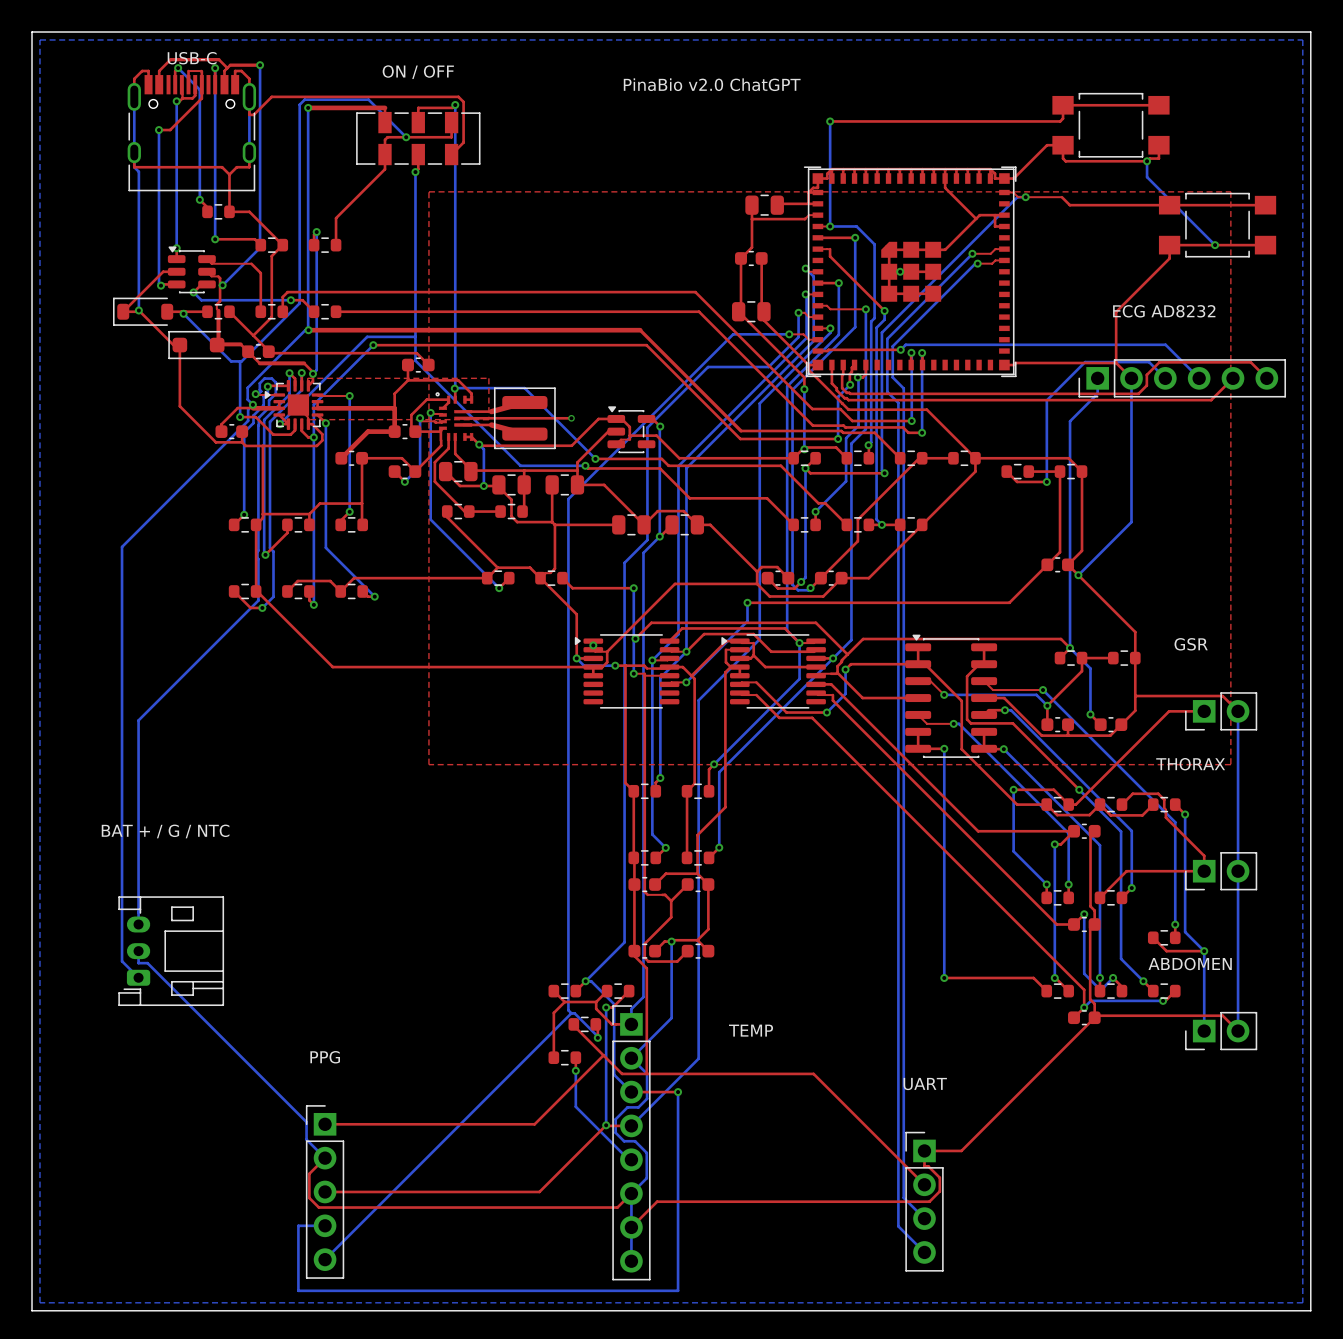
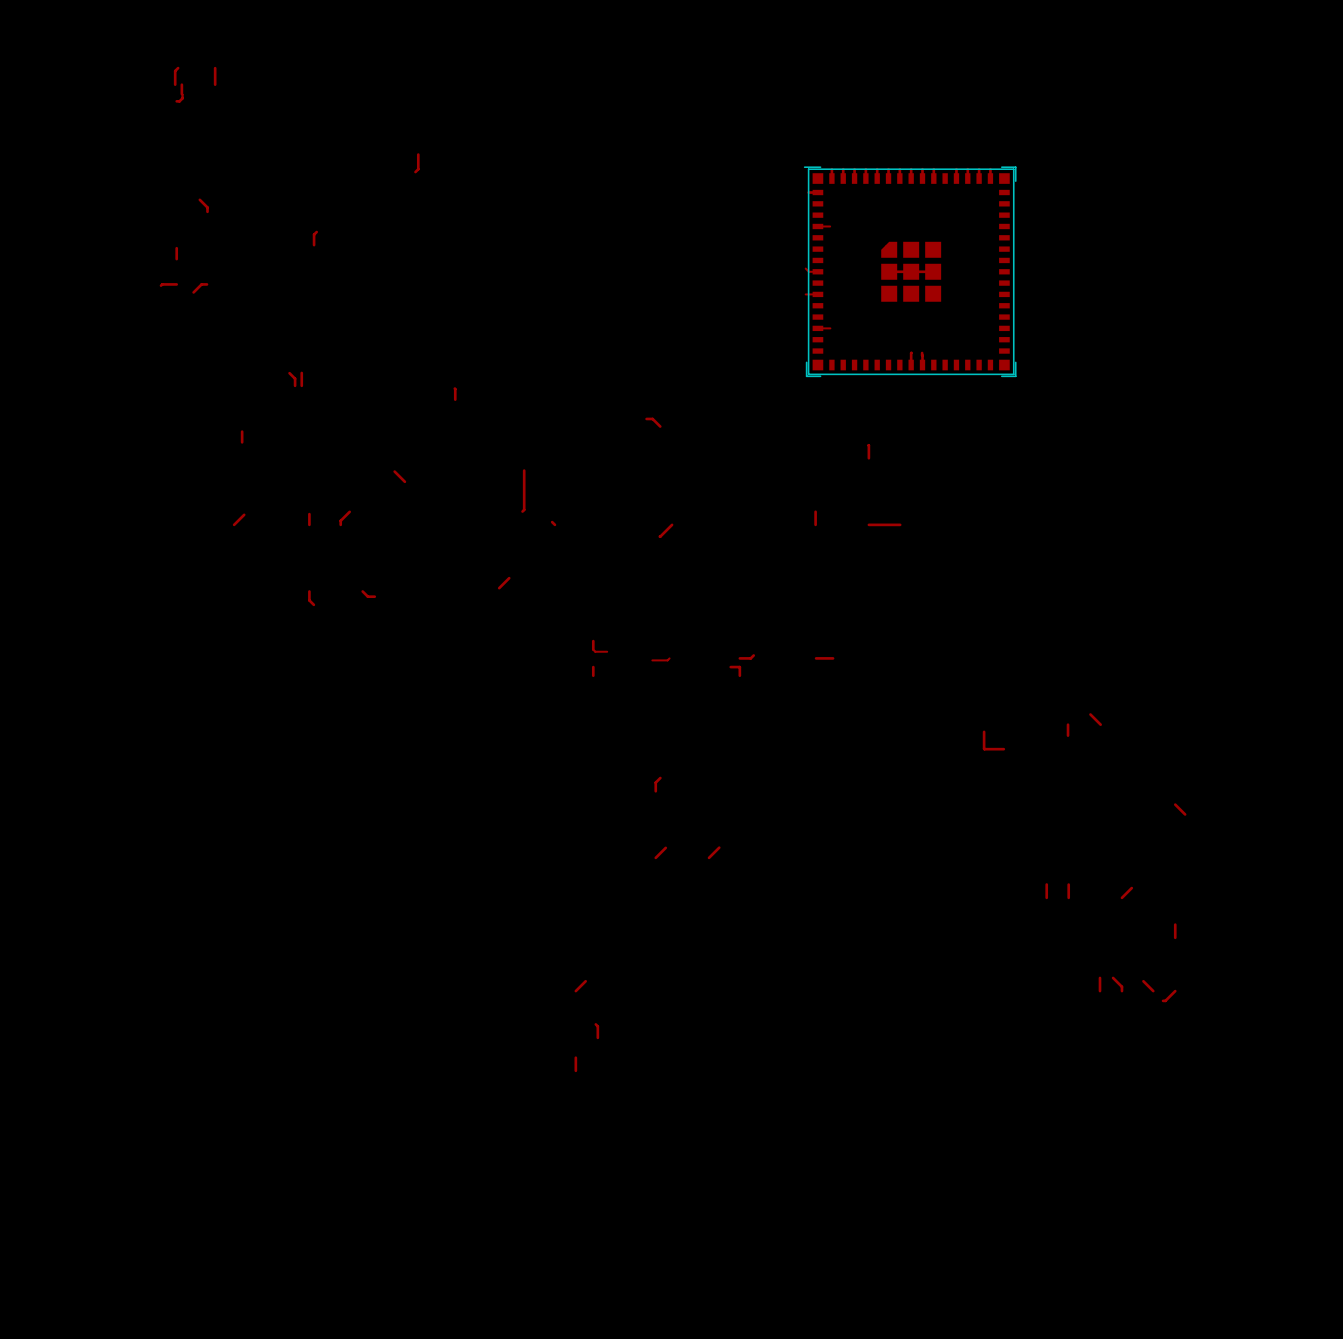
board edge: (32, 32) (1310, 32) (1310, 1310) (32, 1310) (32, 32) -> none
bottom zone outline: (39, 39) (1302, 39) (1302, 1302) (39, 1302) (39, 39) -> none
text: USB-C (192, 58) -> none
top track: (260, 65) (230, 65) (224, 71) (224, 84) -> none
bottom track: (260, 65) (260, 247) (222, 285) -> none
via: (260, 65) -> none
bottom track: (178, 68) (199, 89) (199, 199) -> none
via: (178, 68) -> none
bottom track: (215, 68) (215, 239) -> none
via: (215, 68) -> none
top track: (227, 68) (218, 59) (170, 59) (159, 71) (159, 84) -> none
text: ON / OFF (418, 72) -> none
top track: (148, 84) (148, 71) (142, 71) (134, 78) (134, 96) -> none
top track: (188, 84) (188, 71) (201, 71) (201, 98) (170, 130) (158, 130) -> none
top track: (195, 84) (195, 95) (192, 98) (182, 98) -> none
top track: (235, 84) (235, 71) (241, 71) (249, 78) (249, 114) (253, 114) (271, 96) (458, 96) (463, 101) (463, 142) (451, 154) -> none
text: PinaBio v2.0 ChatGPT (712, 84) -> none
bottom track: (134, 96) (134, 167) (138, 171) (138, 310) -> none
bottom track: (249, 96) (249, 152) -> none
bottom track: (176, 101) (176, 248) -> none
via: (176, 101) -> none
top track: (455, 104) (452, 107) (418, 107) (418, 122) -> none
bottom track: (455, 104) (455, 388) -> none
via: (455, 104) -> none
top track: (1158, 105) (1063, 105) (1063, 118) (1060, 121) (830, 121) -> none
top track: (308, 107) (385, 107) (385, 122) -> none
bottom track: (308, 107) (308, 330) (305, 330) (247, 387) (247, 399) (252, 404) (248, 409) (248, 420) (122, 546) (122, 961) (138, 977) -> none
via: (308, 107) -> none
bottom track: (830, 121) (830, 226) (856, 226) (874, 244) (874, 318) (871, 321) (871, 442) (868, 445) -> none
via: (830, 121) -> none
top track: (451, 122) (451, 137) (387, 137) (385, 139) (385, 169) (336, 218) (336, 245) -> none
part: (1110, 125) -> none
bottom track: (158, 130) (158, 283) (161, 285) -> none
via: (158, 130) -> none
part: (191, 133) -> none
bottom track: (406, 137) (368, 99) (304, 99) (299, 104) (299, 303) (241, 361) (231, 361) (183, 313) -> none
via: (406, 137) -> none
part: (418, 138) -> none
top track: (1158, 145) (1158, 158) (1149, 158) (1147, 161) (1065, 161) (1063, 158) (1063, 145) (1047, 145) (1013, 178) (995, 178) (995, 173) (990, 169) (831, 169) (827, 173) (827, 178) (817, 178) (817, 187) (813, 187) (808, 192) (808, 203) -> none
top track: (134, 152) (134, 167) (222, 167) (229, 174) -> none
top track: (249, 152) (249, 167) (236, 167) (229, 174) -> none
bottom track: (1147, 161) (1147, 177) (1215, 245) -> none
via: (1147, 161) -> none
top track: (945, 169) (945, 187) (976, 218) -> none
bottom track: (415, 172) (415, 360) (520, 465) (585, 465) -> none
via: (415, 172) -> none
top track: (229, 174) (229, 211) (249, 211) (282, 245) (271, 256) (271, 317) (253, 335) -> none
top zone outline: (428, 191) (1230, 191) (1230, 764) (428, 764) (428, 191) -> none
top track: (1004, 192) (1013, 192) (1018, 197) (1061, 197) (1069, 205) (1265, 205) -> none
bottom track: (1025, 197) (1017, 197) (881, 332) (881, 470) (884, 473) -> none
via: (1025, 197) -> none
via: (199, 199) -> none
top track: (817, 203) (777, 205) -> none
top track: (751, 205) (751, 247) (741, 258) (741, 309) (738, 311) (804, 377) (804, 389) -> none
part: (764, 205) -> none
part: (218, 211) -> none
top track: (817, 215) (808, 215) (804, 219) (751, 219) -> none
top track: (995, 215) (995, 226) (1004, 226) -> none
top track: (1004, 215) (979, 215) (945, 249) (889, 249) (889, 293) (933, 293) -> none
part: (1217, 225) -> none
via: (830, 226) -> none
bottom track: (316, 232) (316, 370) (312, 373) -> none
via: (316, 232) -> none
top track: (817, 237) (855, 237) -> none
bottom track: (855, 237) (855, 327) (792, 389) (792, 584) (798, 590) (808, 590) (810, 588) -> none
via: (855, 237) -> none
top track: (215, 239) (254, 239) (260, 245) -> none
via: (215, 239) -> none
part: (271, 245) -> none
part: (325, 245) -> none
via: (1215, 245) -> none
top track: (1265, 245) (1169, 245) (1169, 258) (1116, 311) (1116, 363) -> none
via: (176, 248) -> none
top track: (817, 249) (830, 249) (830, 256) (884, 310) -> none
top track: (1004, 249) (995, 249) (990, 253) (972, 253) -> none
bottom track: (972, 253) (887, 338) (887, 391) (898, 402) (898, 1226) (924, 1252) -> none
via: (972, 253) -> none
part: (751, 258) -> none
top track: (761, 258) (761, 309) (763, 311) (763, 320) (808, 365) (817, 365) -> none
top track: (207, 259) (211, 263) (251, 263) (260, 273) (260, 311) -> none
top track: (1004, 260) (995, 260) (992, 263) (977, 263) -> none
bottom track: (977, 263) (975, 263) (892, 346) (892, 377) (903, 388) (903, 1197) (924, 1218) -> none
via: (977, 263) -> none
bottom track: (805, 268) (813, 276) (813, 340) (686, 468) (686, 651) (660, 677) (660, 778) -> none
via: (805, 268) -> none
part: (191, 269) -> none
top track: (176, 271) (163, 271) (123, 311) (138, 310) (173, 345) (179, 345) (179, 406) (215, 442) (242, 442) (245, 445) (316, 445) (322, 440) (322, 434) (312, 424) (308, 424) (308, 417) (297, 407) (298, 404) -> none
top track: (207, 271) (211, 276) (220, 278) (220, 301) (216, 304) (218, 344) -> none
via: (900, 271) -> none
top track: (817, 283) (838, 283) -> none
bottom track: (838, 283) (838, 334) (787, 386) (787, 630) (799, 643) (799, 678) (714, 764) -> none
via: (838, 283) -> none
via: (161, 285) -> none
via: (222, 285) -> none
bottom track: (193, 292) (201, 300) (290, 300) -> none
via: (193, 292) -> none
bottom track: (805, 294) (806, 338) (678, 466) (678, 634) (652, 660) (652, 834) (665, 847) -> none
via: (805, 294) -> none
top track: (290, 300) (302, 300) (314, 311) -> none
via: (290, 300) -> none
top track: (817, 305) (826, 305) (830, 309) (865, 309) -> none
bottom track: (865, 309) (865, 429) (851, 443) (851, 640) (719, 772) (719, 847) -> none
via: (865, 309) -> none
via: (138, 310) -> none
bottom track: (884, 310) (884, 319) (876, 327) (876, 519) (881, 524) -> none
via: (884, 310) -> none
part: (143, 311) -> none
top track: (167, 311) (181, 311) (183, 313) (185, 311) (207, 311) -> none
part: (218, 311) -> none
top track: (229, 311) (270, 353) (416, 353) (428, 365) -> none
part: (271, 311) -> none
top track: (282, 311) (282, 297) (287, 292) (695, 292) (812, 409) (840, 409) (852, 421) (911, 421) -> none
part: (325, 311) -> none
top track: (336, 311) (699, 311) (812, 425) (903, 427) (908, 432) (922, 432) -> none
part: (751, 311) -> none
text: ECG AD8232 (1164, 311) -> none
top track: (798, 312) (804, 312) (808, 317) (817, 317) -> none
bottom track: (798, 312) (798, 337) (768, 367) (708, 367) (647, 427) (647, 539) (624, 562) (624, 942) (585, 981) (591, 981) (614, 1004) (614, 1074) (631, 1092) -> none
via: (798, 312) -> none
via: (183, 313) -> none
bottom track: (830, 328) (830, 332) (759, 403) (759, 639) (698, 700) (698, 1058) (631, 1125) -> none
via: (830, 328) -> none
top track: (308, 330) (640, 330) (741, 430) (874, 432) (900, 458) -> none
via: (308, 330) -> none
top track: (789, 334) (803, 334) (808, 339) (817, 339) -> none
bottom track: (789, 334) (733, 334) (568, 499) (568, 1010) (571, 1013) -> none
via: (789, 334) -> none
bottom track: (415, 336) (367, 336) (279, 424) -> none
top track: (218, 344) (240, 344) (259, 363) (304, 363) (312, 372) (312, 381) (308, 385) -> none
part: (196, 345) -> none
top track: (373, 345) (646, 345) (740, 438) (838, 438) -> none
bottom track: (373, 345) (313, 404) (313, 604) -> none
via: (373, 345) -> none
top track: (900, 349) (817, 351) -> none
bottom track: (900, 349) (905, 344) (1165, 344) (1199, 378) -> none
via: (900, 349) -> none
part: (258, 351) -> none
bottom track: (911, 352) (911, 421) -> none
via: (911, 352) -> none
via: (922, 352) -> none
bottom track: (922, 353) (922, 432) -> none
bottom track: (240, 361) (240, 417) -> none
top track: (1116, 363) (1131, 378) -> none
top track: (1116, 363) (1015, 363) (1013, 365) (1004, 365) -> none
top track: (407, 365) (407, 380) -> none
part: (418, 365) -> none
top track: (808, 365) (808, 370) (848, 409) (926, 409) (975, 458) -> none
top track: (831, 365) (831, 383) (848, 400) (1211, 400) (1233, 378) -> none
top track: (843, 365) (842, 388) (850, 393) (1138, 393) (1146, 385) (1146, 374) (1159, 362) (1250, 362) (1266, 378) -> none
top track: (854, 365) (849, 374) (850, 384) -> none
top track: (865, 365) (865, 374) (862, 377) (857, 377) -> none
bottom track: (301, 372) (301, 390) (269, 421) (269, 548) (273, 551) (273, 596) (262, 607) -> none
via: (301, 372) -> none
bottom track: (289, 373) (289, 394) (264, 419) (265, 554) -> none
via: (289, 373) -> none
via: (312, 373) -> none
bottom track: (857, 377) (858, 425) (846, 438) (846, 481) (815, 511) -> none
via: (857, 377) -> none
top zone outline: (307, 378) (488, 378) (488, 419) (307, 419) (307, 378) -> none
bottom track: (1097, 378) (1097, 393) (1070, 421) (1070, 648) (1090, 668) (1090, 714) -> none
bottom track: (1131, 378) (1131, 522) (1078, 575) -> none
bottom track: (1165, 378) (1149, 362) (1085, 362) (1046, 400) (1046, 481) -> none
part: (1182, 378) -> none
top track: (407, 380) (458, 380) (471, 393) (471, 399) (464, 399) -> none
top track: (407, 380) (394, 393) (394, 408) -> none
bottom track: (850, 384) (838, 396) (838, 438) -> none
via: (850, 384) -> none
top track: (288, 385) (267, 386) -> none
bottom track: (267, 386) (267, 392) (263, 396) (263, 405) (253, 415) (253, 423) (244, 432) (244, 514) -> none
via: (267, 386) -> none
via: (454, 388) -> none
bottom track: (455, 388) (524, 388) (595, 458) -> none
bottom track: (804, 389) (804, 449) -> none
via: (804, 389) -> none
top track: (255, 394) (279, 394) -> none
bottom track: (255, 394) (261, 391) (259, 383) (264, 378) (271, 378) (275, 382) (275, 393) (269, 400) (269, 407) (258, 417) (258, 600) (138, 720) (138, 924) -> none
via: (255, 394) -> none
top track: (317, 394) (349, 396) -> none
bottom track: (349, 396) (349, 511) -> none
via: (349, 396) -> none
top track: (279, 401) (279, 408) (252, 408) -> none
top track: (317, 401) (317, 408) (394, 408) -> none
top track: (524, 402) (491, 411) (463, 411) -> none
via: (252, 404) -> none
part: (294, 404) -> none
top track: (252, 408) (237, 408) (221, 424) (221, 431) -> none
top track: (394, 408) (394, 431) (368, 431) (341, 458) -> none
top track: (442, 408) (448, 402) (448, 399) (426, 399) (411, 415) (411, 427) (415, 431) (440, 431) -> none
top track: (430, 412) (442, 414) -> none
bottom track: (430, 412) (430, 519) (499, 588) -> none
via: (430, 412) -> none
top track: (279, 414) (288, 424) (279, 424) -> none
top track: (317, 414) (325, 423) -> none
part: (454, 416) -> none
top track: (240, 417) (255, 417) (273, 434) (290, 434) (295, 430) (295, 424) -> none
via: (240, 417) -> none
top track: (420, 418) (421, 421) (442, 421) -> none
bottom track: (420, 418) (420, 466) (404, 481) -> none
via: (420, 418) -> none
top track: (463, 418) (571, 418) -> none
part: (524, 418) -> none
via: (571, 418) -> none
via: (911, 421) -> none
bottom track: (325, 423) (325, 547) (374, 596) -> none
via: (325, 423) -> none
via: (279, 424) -> none
top track: (301, 424) (301, 430) (308, 437) (313, 437) -> none
top track: (463, 424) (491, 424) (524, 434) -> none
bottom track: (660, 426) (659, 536) (643, 552) (643, 997) (631, 1009) (631, 1024) -> none
via: (660, 426) -> none
top track: (442, 428) (440, 430) (441, 445) (415, 471) (401, 458) (362, 458) (362, 524) -> none
part: (631, 429) -> none
part: (231, 431) -> none
part: (404, 431) -> none
top track: (616, 431) (608, 431) (577, 462) (577, 470) (471, 470) -> none
via: (922, 432) -> none
top track: (629, 435) (656, 435) (679, 458) (793, 458) (806, 447) (836, 447) (846, 458) -> none
top track: (448, 436) (448, 448) (434, 462) (434, 481) (464, 511) (500, 511) -> none
top track: (455, 436) (455, 453) (471, 470) -> none
top track: (464, 436) (471, 436) (480, 445) (571, 445) (598, 418) (621, 418) (629, 427) (629, 439) (620, 439) (616, 444) -> none
via: (313, 437) -> none
via: (838, 438) -> none
bottom track: (479, 444) (483, 449) (483, 485) -> none
via: (479, 444) -> none
top track: (262, 445) (262, 518) (256, 524) (256, 591) (332, 667) (602, 667) (607, 662) (607, 651) (675, 583) (757, 583) -> none
via: (868, 445) -> none
via: (804, 449) -> none
part: (351, 458) -> none
top track: (595, 458) (661, 458) (668, 465) (780, 465) (818, 503) (825, 503) (846, 524) -> none
via: (595, 458) -> none
part: (804, 458) -> none
top track: (815, 458) (805, 468) (810, 473) (884, 473) -> none
part: (857, 458) -> none
part: (911, 458) -> none
top track: (953, 458) (919, 458) (857, 519) (857, 541) (810, 588) -> none
part: (964, 458) -> none
top track: (975, 458) (1068, 458) (1082, 471) (1082, 550) (1068, 564) (1135, 632) (1135, 710) (1110, 735) (1041, 735) (1004, 698) (984, 698) -> none
top track: (975, 458) (975, 471) (868, 578) (841, 578) (823, 596) (769, 596) (757, 583) -> none
top track: (585, 465) (588, 468) (660, 468) (689, 498) (767, 498) (793, 524) -> none
via: (585, 465) -> none
bottom track: (805, 468) (805, 577) (801, 581) -> none
via: (805, 468) -> none
top track: (577, 470) (577, 484) (604, 484) (644, 524) (657, 511) (683, 511) (697, 524) (710, 524) (757, 571) -> none
part: (404, 471) -> none
top track: (445, 471) (460, 485) (497, 485) -> none
part: (458, 471) -> none
top track: (1006, 471) (1017, 481) (1046, 481) -> none
part: (1017, 471) -> none
top track: (1028, 471) (1060, 471) (1060, 552) (1009, 602) (747, 602) -> none
part: (1071, 471) -> none
via: (884, 473) -> none
via: (404, 481) -> none
via: (1046, 481) -> none
part: (511, 484) -> none
top track: (552, 484) (552, 522) (517, 522) (511, 516) (511, 499) (497, 485) -> none
part: (564, 484) -> none
via: (483, 485) -> none
top track: (362, 503) (319, 503) (309, 514) (262, 514) -> none
via: (349, 511) -> none
top track: (447, 511) (447, 517) (497, 567) -> none
part: (458, 511) -> none
part: (511, 511) -> none
via: (815, 511) -> none
via: (244, 514) -> none
part: (245, 524) -> none
top track: (287, 524) (287, 532) (265, 554) -> none
part: (298, 524) -> none
part: (351, 524) -> none
top track: (618, 524) (554, 524) (554, 568) (540, 578) -> none
part: (631, 524) -> none
part: (684, 524) -> none
part: (804, 524) -> none
part: (857, 524) -> none
via: (881, 524) -> none
part: (911, 524) -> none
via: (659, 536) -> none
via: (265, 554) -> none
part: (1057, 564) -> none
top track: (497, 567) (487, 578) (354, 578) (340, 591) (330, 581) (297, 581) (287, 591) -> none
top track: (497, 567) (530, 567) (576, 614) (576, 658) (593, 658) -> none
top track: (757, 571) (757, 583) -> none
top track: (757, 571) (761, 567) (777, 567) (788, 578) -> none
via: (1078, 575) -> none
part: (498, 578) -> none
part: (551, 578) -> none
top track: (562, 578) (572, 588) (633, 588) -> none
top track: (767, 578) (778, 588) (794, 588) (801, 581) -> none
part: (777, 578) -> none
part: (831, 578) -> none
via: (801, 581) -> none
via: (499, 588) -> none
bottom track: (633, 588) (633, 673) -> none
via: (633, 588) -> none
via: (810, 588) -> none
top track: (234, 591) (250, 607) (262, 607) -> none
part: (245, 591) -> none
part: (298, 591) -> none
part: (351, 591) -> none
via: (374, 596) -> none
bottom track: (747, 602) (747, 621) (686, 682) -> none
via: (747, 602) -> none
via: (313, 604) -> none
via: (262, 607) -> none
top track: (635, 638) (651, 622) (815, 622) (847, 654) -> none
via: (635, 638) -> none
top track: (669, 641) (682, 628) (784, 628) (799, 643) (814, 643) (816, 641) -> none
via: (799, 643) -> none
text: GSR (1191, 644) -> none
via: (593, 645) -> none
top track: (918, 647) (918, 664) -> none
top track: (984, 647) (984, 664) (979, 664) (967, 676) (967, 719) (971, 723) (1012, 723) (1079, 789) -> none
via: (1070, 648) -> none
top track: (669, 649) (671, 651) (686, 651) (704, 634) (753, 634) (771, 651) (814, 651) (816, 649) -> none
top track: (739, 649) (725, 649) (725, 662) (730, 667) (725, 672) (725, 807) (697, 835) (697, 873) -> none
via: (686, 651) -> none
bottom track: (576, 658) (583, 665) (615, 665) -> none
via: (576, 658) -> none
via: (833, 658) -> none
top track: (1060, 658) (1070, 648) (1060, 639) (863, 639) (841, 660) (837, 666) (837, 672) -> none
part: (1071, 658) -> none
top track: (1113, 658) (1082, 658) (1082, 671) (1047, 705) (1047, 724) -> none
part: (1124, 658) -> none
via: (652, 660) -> none
top track: (615, 665) (644, 665) (646, 668) -> none
via: (615, 665) -> none
top track: (625, 665) (625, 783) (633, 791) (634, 955) (646, 968) (646, 1073) -> none
top track: (816, 667) (765, 667) (753, 655) (753, 643) (726, 641) (691, 675) -> none
top track: (647, 668) (682, 667) (691, 675) -> none
top track: (845, 669) (850, 664) (924, 664) (961, 700) (961, 749) (1017, 804) (1046, 804) (1057, 815) (1089, 815) (1099, 804) (1110, 815) (1142, 815) (1153, 804) -> none
bottom track: (845, 669) (845, 693) (826, 712) -> none
via: (845, 669) -> none
part: (627, 671) -> none
part: (773, 671) -> none
top track: (837, 672) (862, 698) (918, 698) -> none
top track: (837, 672) (818, 673) (816, 675) -> none
top track: (633, 673) (644, 673) (644, 891) (647, 894) (665, 894) (671, 901) -> none
via: (633, 673) -> none
top track: (644, 675) (669, 675) -> none
top track: (691, 675) (694, 678) (694, 783) (687, 791) (687, 857) -> none
top track: (918, 681) (930, 681) (944, 694) -> none
top track: (984, 681) (993, 690) (1043, 690) -> none
top track: (686, 682) (671, 682) (669, 684) -> none
via: (686, 682) -> none
top track: (739, 684) (741, 682) (756, 682) (786, 712) (826, 712) -> none
top track: (816, 684) (831, 684) (978, 831) (1074, 831) (1060, 844) (1054, 844) -> none
bottom track: (1043, 690) (1175, 822) (1175, 924) -> none
via: (1043, 690) -> none
top track: (739, 693) (741, 695) (756, 695) (779, 717) (812, 717) (1084, 989) (1084, 1007) (1074, 1017) -> none
top track: (816, 693) (818, 695) (832, 695) (832, 700) (1056, 924) (1074, 924) (1084, 914) -> none
bottom track: (944, 694) (1036, 694) (1047, 705) -> none
via: (944, 694) -> none
part: (951, 696) -> none
top track: (1135, 696) (1222, 696) (1238, 711) -> none
via: (1047, 705) -> none
top track: (1004, 710) (988, 710) (984, 714) -> none
bottom track: (1004, 710) (1011, 710) (1131, 830) (1131, 888) -> none
via: (1004, 710) -> none
top track: (1204, 711) (1169, 711) (1075, 804) (1068, 804) (1053, 789) (1013, 789) -> none
part: (1221, 711) -> none
bottom track: (1238, 711) (1238, 1031) -> none
via: (826, 712) -> none
top track: (918, 714) (927, 723) (953, 723) -> none
via: (1090, 714) -> none
bottom track: (953, 723) (959, 723) (1068, 833) (1068, 884) -> none
via: (953, 723) -> none
part: (1057, 724) -> none
part: (1110, 724) -> none
top track: (918, 731) (918, 748) (944, 748) -> none
bottom track: (944, 748) (944, 977) -> none
via: (944, 748) -> none
bottom track: (1003, 749) (1099, 845) (1099, 977) -> none
via: (1003, 749) -> none
top track: (714, 764) (709, 769) (709, 791) -> none
via: (714, 764) -> none
text: THORAX (1190, 764) -> none
via: (660, 778) -> none
bottom track: (1013, 789) (1013, 851) (1046, 884) -> none
via: (1013, 789) -> none
bottom track: (1079, 789) (1121, 831) (1121, 958) (1143, 981) -> none
via: (1079, 789) -> none
part: (644, 791) -> none
part: (698, 791) -> none
part: (1057, 804) -> none
part: (1110, 804) -> none
top track: (1121, 804) (1132, 793) (1158, 793) (1164, 799) (1165, 817) (1204, 855) (1204, 871) (1126, 871) (1099, 897) -> none
part: (1164, 804) -> none
bottom track: (1185, 814) (1185, 932) (1204, 951) (1204, 1031) -> none
via: (1185, 814) -> none
text: BAT + / G / NTC (165, 831) -> none
part: (1084, 831) -> none
top track: (1094, 831) (1090, 835) (1090, 906) (1094, 910) (1094, 924) (1090, 928) (1090, 999) (1094, 1003) (1094, 1017) -> none
bottom track: (1054, 844) (1054, 978) -> none
via: (1054, 844) -> none
via: (665, 847) -> none
via: (719, 847) -> none
part: (644, 857) -> none
part: (698, 857) -> none
part: (1221, 871) -> none
top track: (697, 873) (665, 873) (655, 884) -> none
top track: (697, 873) (708, 884) (708, 929) (697, 940) -> none
part: (644, 884) -> none
top track: (687, 884) (671, 901) -> none
part: (698, 884) -> none
via: (1046, 884) -> none
via: (1068, 884) -> none
via: (1131, 888) -> none
part: (1057, 897) -> none
part: (1110, 897) -> none
top track: (671, 901) (671, 917) (645, 943) (644, 957) (648, 961) (677, 961) (687, 951) -> none
bottom track: (1084, 914) (1084, 973) (1097, 986) (1104, 986) (1113, 977) -> none
via: (1084, 914) -> none
part: (1084, 924) -> none
via: (1175, 924) -> none
top track: (1153, 937) (1166, 951) (1204, 951) -> none
part: (1164, 937) -> none
top track: (697, 940) (708, 951) -> none
top track: (697, 940) (664, 941) (655, 951) -> none
bottom track: (671, 941) (671, 1018) (631, 1058) (647, 1073) (647, 1098) (638, 1107) (627, 1107) (615, 1119) (615, 1132) (624, 1141) (635, 1141) (646, 1152) (646, 1178) (631, 1193) (631, 1261) -> none
via: (671, 941) -> none
bottom track: (138, 951) (138, 963) (147, 963) (306, 1122) (306, 1139) (325, 1158) -> none
part: (171, 951) -> none
part: (644, 951) -> none
part: (698, 951) -> none
via: (1204, 951) -> none
text: ABDOMEN (1190, 964) -> none
top track: (944, 977) (1033, 977) (1046, 991) -> none
via: (944, 977) -> none
via: (1099, 977) -> none
via: (1113, 977) -> none
top track: (1054, 978) (1068, 991) -> none
via: (1054, 978) -> none
via: (585, 981) -> none
via: (1143, 981) -> none
top track: (553, 991) (564, 1002) -> none
part: (564, 991) -> none
top track: (607, 991) (596, 1002) -> none
part: (618, 991) -> none
top track: (629, 991) (612, 1007) (606, 1007) -> none
part: (1057, 991) -> none
part: (1110, 991) -> none
part: (1164, 991) -> none
bottom track: (1163, 1000) (1090, 1000) (1084, 1007) -> none
via: (1163, 1000) -> none
top track: (564, 1002) (596, 1002) -> none
top track: (564, 1002) (553, 1012) (553, 1057) -> none
top track: (596, 1002) (596, 1008) (611, 1024) (631, 1024) -> none
bottom track: (606, 1007) (606, 1125) -> none
via: (606, 1007) -> none
via: (1084, 1007) -> none
bottom track: (571, 1013) (325, 1259) -> none
bottom track: (571, 1013) (574, 1013) (597, 1037) -> none
part: (1084, 1017) -> none
top track: (573, 1024) (622, 1073) (813, 1073) (924, 1184) -> none
part: (584, 1024) -> none
text: TEMP (751, 1030) -> none
part: (1221, 1031) -> none
top track: (1238, 1031) (1222, 1015) (1096, 1015) (961, 1150) (924, 1150) (924, 1166) (928, 1166) (939, 1177) (939, 1191) (929, 1201) (657, 1201) (631, 1227) -> none
via: (597, 1037) -> none
top track: (603, 1055) (534, 1124) (325, 1124) -> none
text: PPG (325, 1057) -> none
part: (564, 1057) -> none
bottom track: (575, 1070) (575, 1106) (628, 1159) (631, 1159) -> none
via: (575, 1070) -> none
text: UART (925, 1084) -> none
top track: (631, 1092) (678, 1092) -> none
bottom track: (678, 1092) (678, 1290) (298, 1290) (298, 1225) (325, 1225) -> none
via: (678, 1092) -> none
via: (606, 1125) -> none
top track: (631, 1125) (606, 1125) (539, 1191) (325, 1191) -> none
part: (631, 1142) -> none
top track: (325, 1158) (309, 1173) (309, 1197) (318, 1207) (617, 1207) (631, 1193) -> none
part: (325, 1191) -> none
part: (924, 1201) -> none

